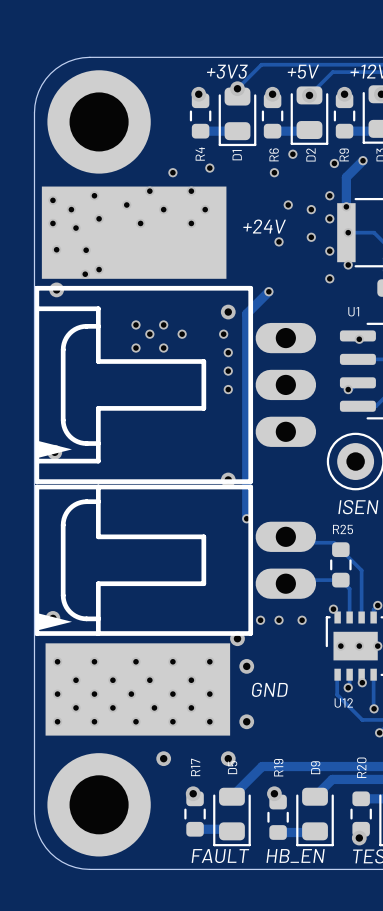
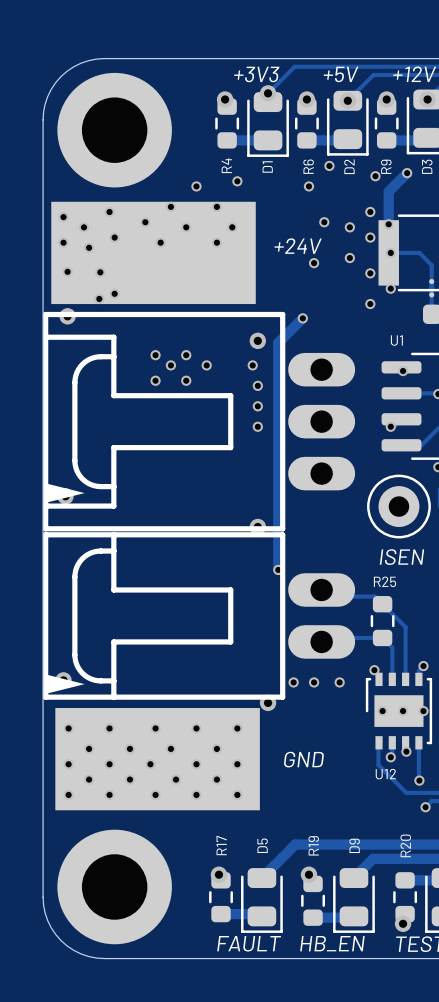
via: (246, 666) -> none
via: (246, 721) -> none
via: (163, 758) -> none
via: (228, 758) -> none

